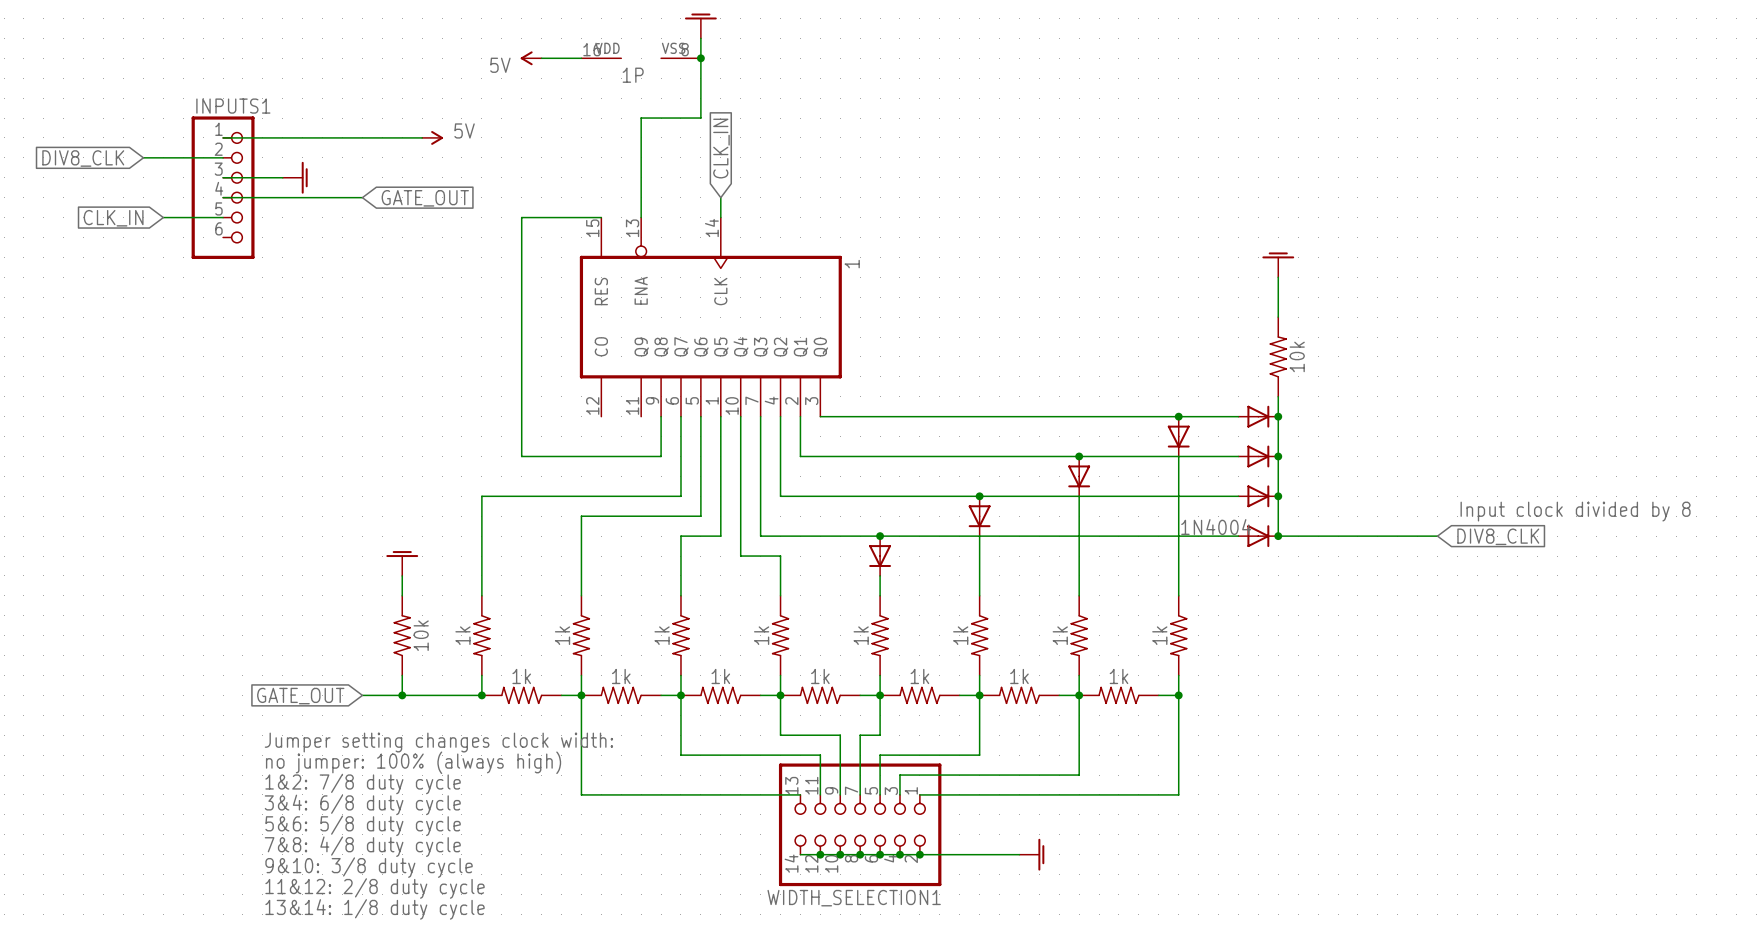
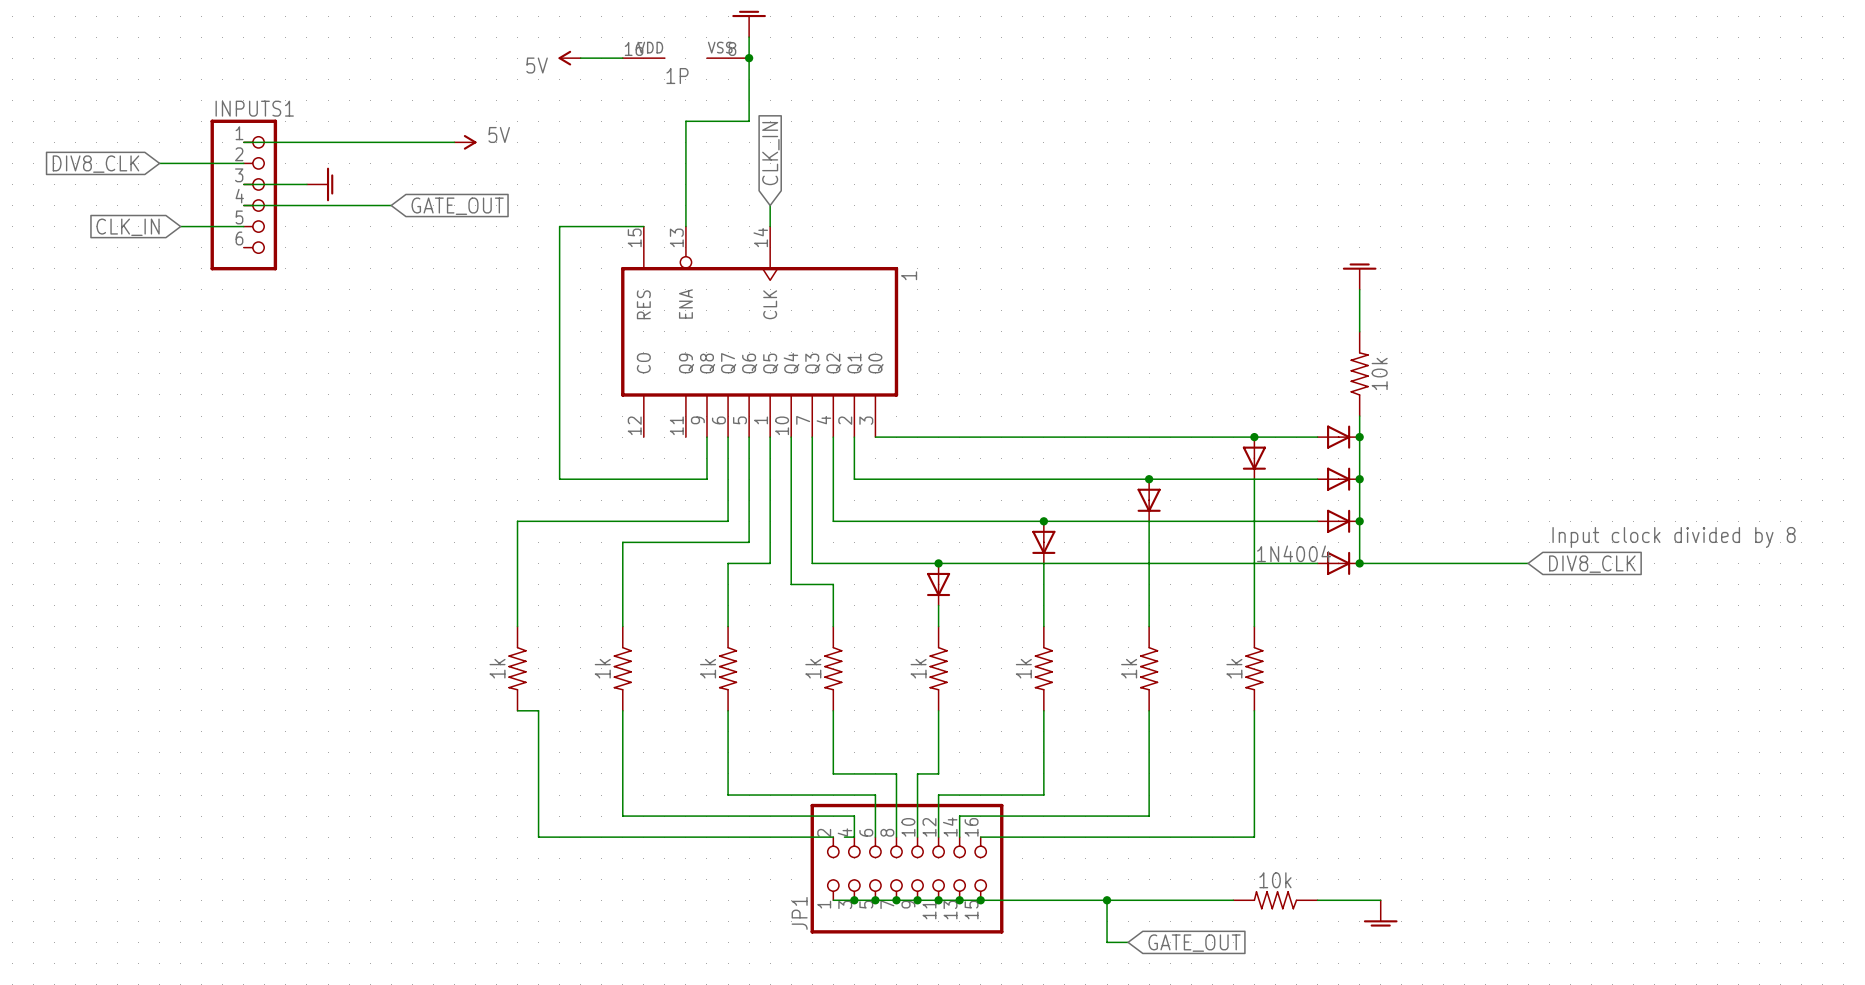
power symbol: (402, 563) -> none
wire: (402, 575) (402, 595) -> none
part: 10k (402, 635) -> none
wire: (402, 675) (402, 695) -> none
wire: (481, 675) (481, 695) (362, 695) -> none
junction: (402, 695) -> none
junction: (481, 695) -> none
part: 1k (521, 695) -> none
wire: (561, 695) (581, 695) -> none
junction: (581, 695) -> none
part: 1k (621, 695) -> none
wire: (661, 695) (680, 695) -> none
junction: (680, 695) -> none
part: 1k (720, 695) -> none
wire: (760, 695) (780, 695) -> (833, 900) (854, 900)
junction: (780, 695) -> none
part: 1k (820, 695) -> none
wire: (860, 695) (880, 695) -> none
junction: (880, 695) -> none
part: 1k (919, 695) -> none
wire: (959, 695) (979, 695) -> none
junction: (979, 695) -> none
part: 1k (1019, 695) -> none
wire: (1059, 695) (1079, 695) -> none
junction: (1079, 695) -> none
part: 1k (1118, 695) -> none
wire: (1158, 695) (1178, 695) -> none
junction: (1178, 695) -> none
global label: GATE_OUT (300, 696) -> none
text: Jumper setting changes clock width: (438, 742) -> none
text: no jumper: 100% (always high) (413, 762) -> none
wire: (581, 775) (581, 794) -> (517, 710) (538, 710) (538, 837) (622, 837)
wire: none -> (622, 816) (854, 816) (854, 837)
text: 1&2: 7/8 duty cycle (363, 784) -> none
wire: (780, 794) (791, 794) -> none
text: 3&4: 6/8 duty cycle (362, 804) -> none
JP1: none -> (907, 868)
WIDTH_SELECTION1: (860, 824) -> none
text: 5&6: 5/8 duty cycle (363, 825) -> none
text: 7&8: 4/8 duty cycle (362, 846) -> none
junction: none -> (854, 900)
wire: none -> (1085, 900) (1233, 900)
power symbol: (1031, 854) -> none
wire: none -> (1107, 900) (1107, 942) (1128, 942)
junction: none -> (1107, 900)
part: none -> 10k (1275, 900)
wire: none -> (1317, 900) (1380, 900)
text: 9&10: 3/8 duty cycle (369, 867) -> none
power symbol: none -> (1380, 913)
text: 11&12: 2/8 duty cycle (375, 888) -> none
global label: none -> GATE_OUT (1194, 943)
text: 13&14: 1/8 duty cycle (375, 909) -> none

